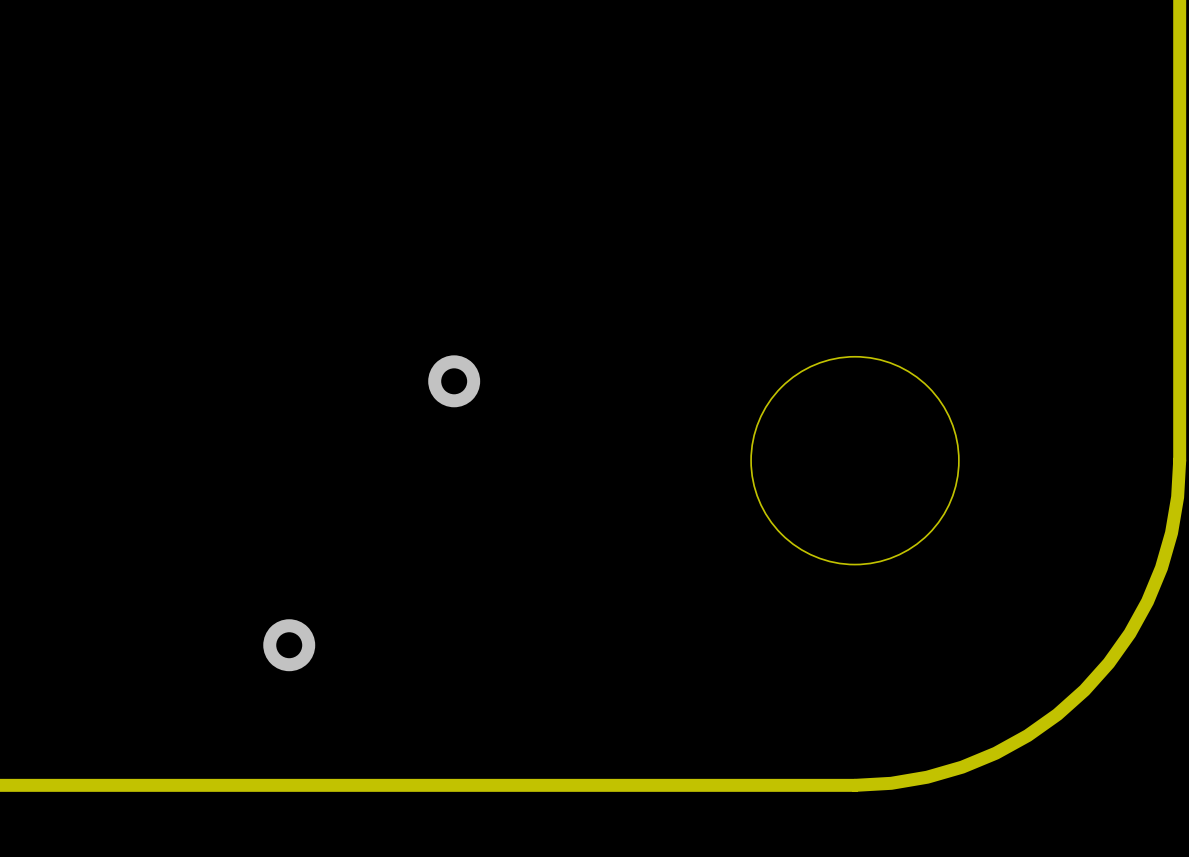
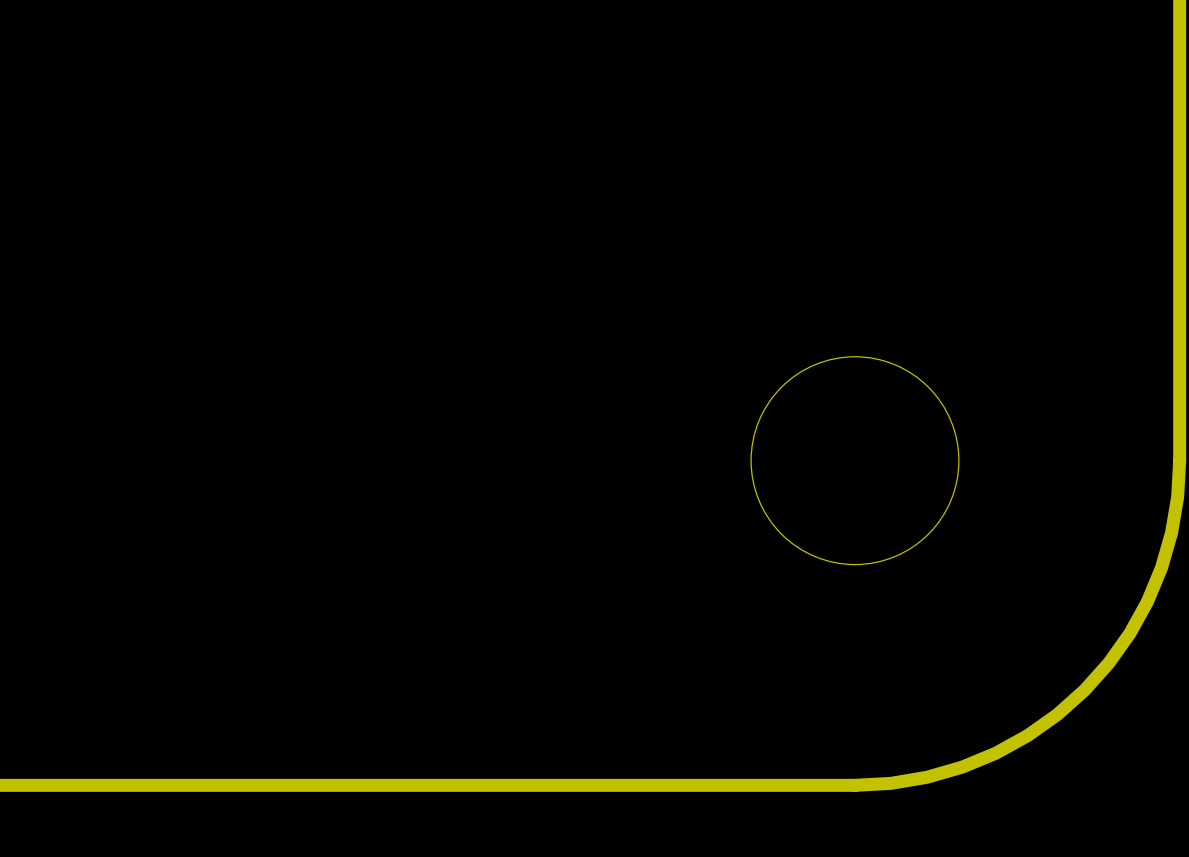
via: (454, 381) -> none
via: (289, 645) -> none

